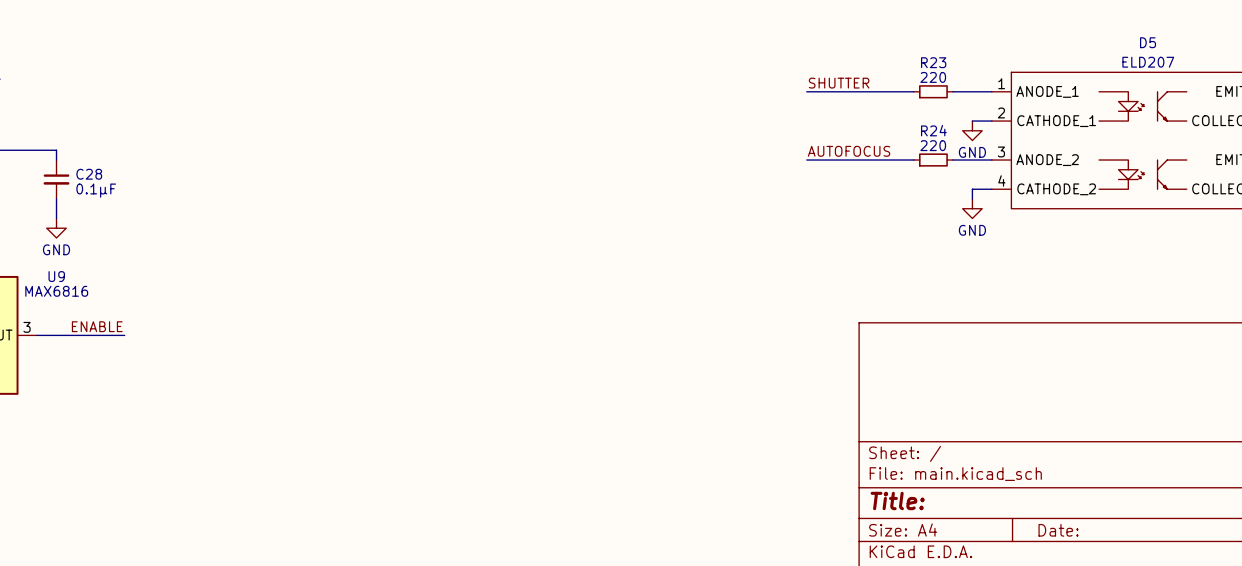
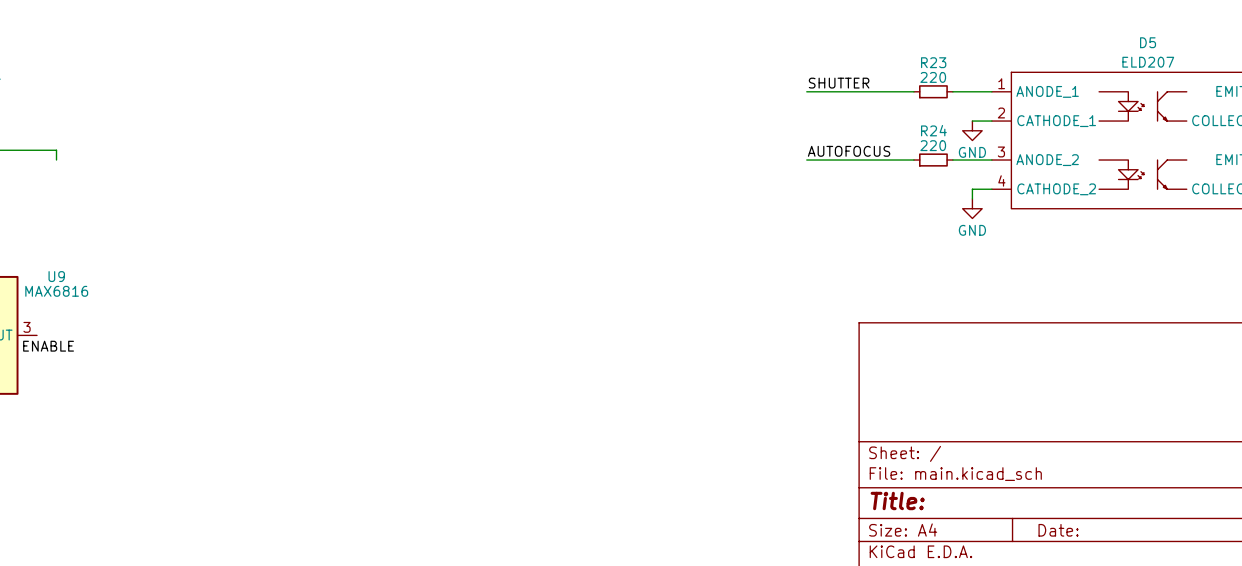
C28: 0.1µF (56, 179) -> none
wire: (56, 198) (56, 218) -> none
power symbol: GND (56, 228) -> none
label position: ENABLE (97, 326) -> ENABLE (48, 346)
wire: (37, 335) (124, 335) -> none

